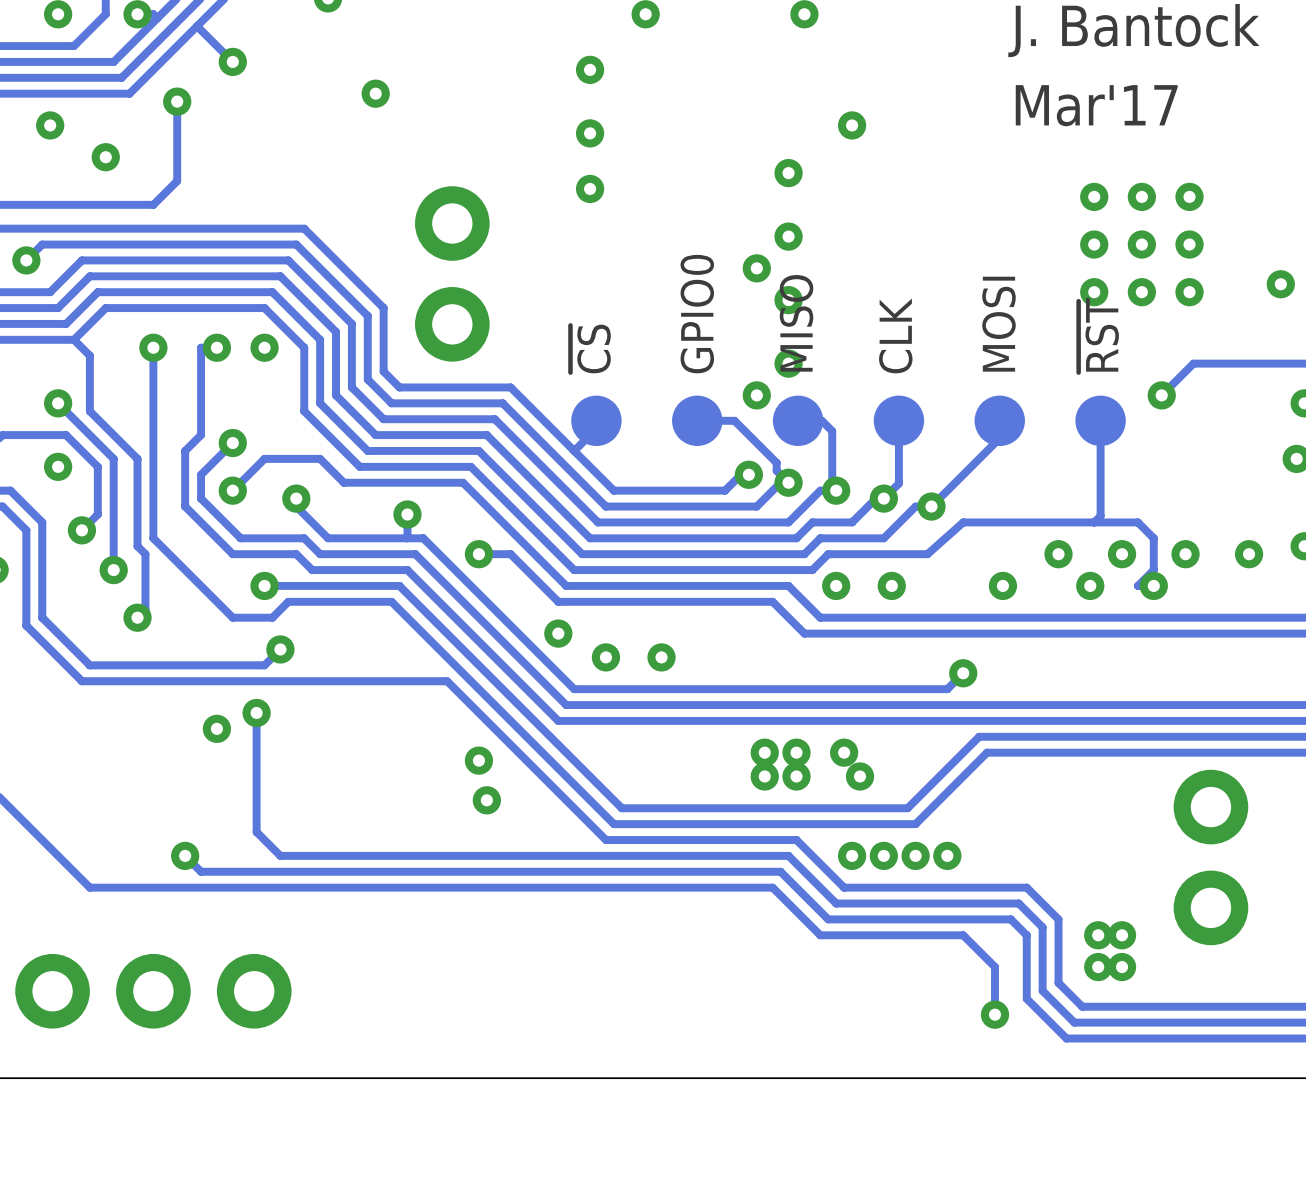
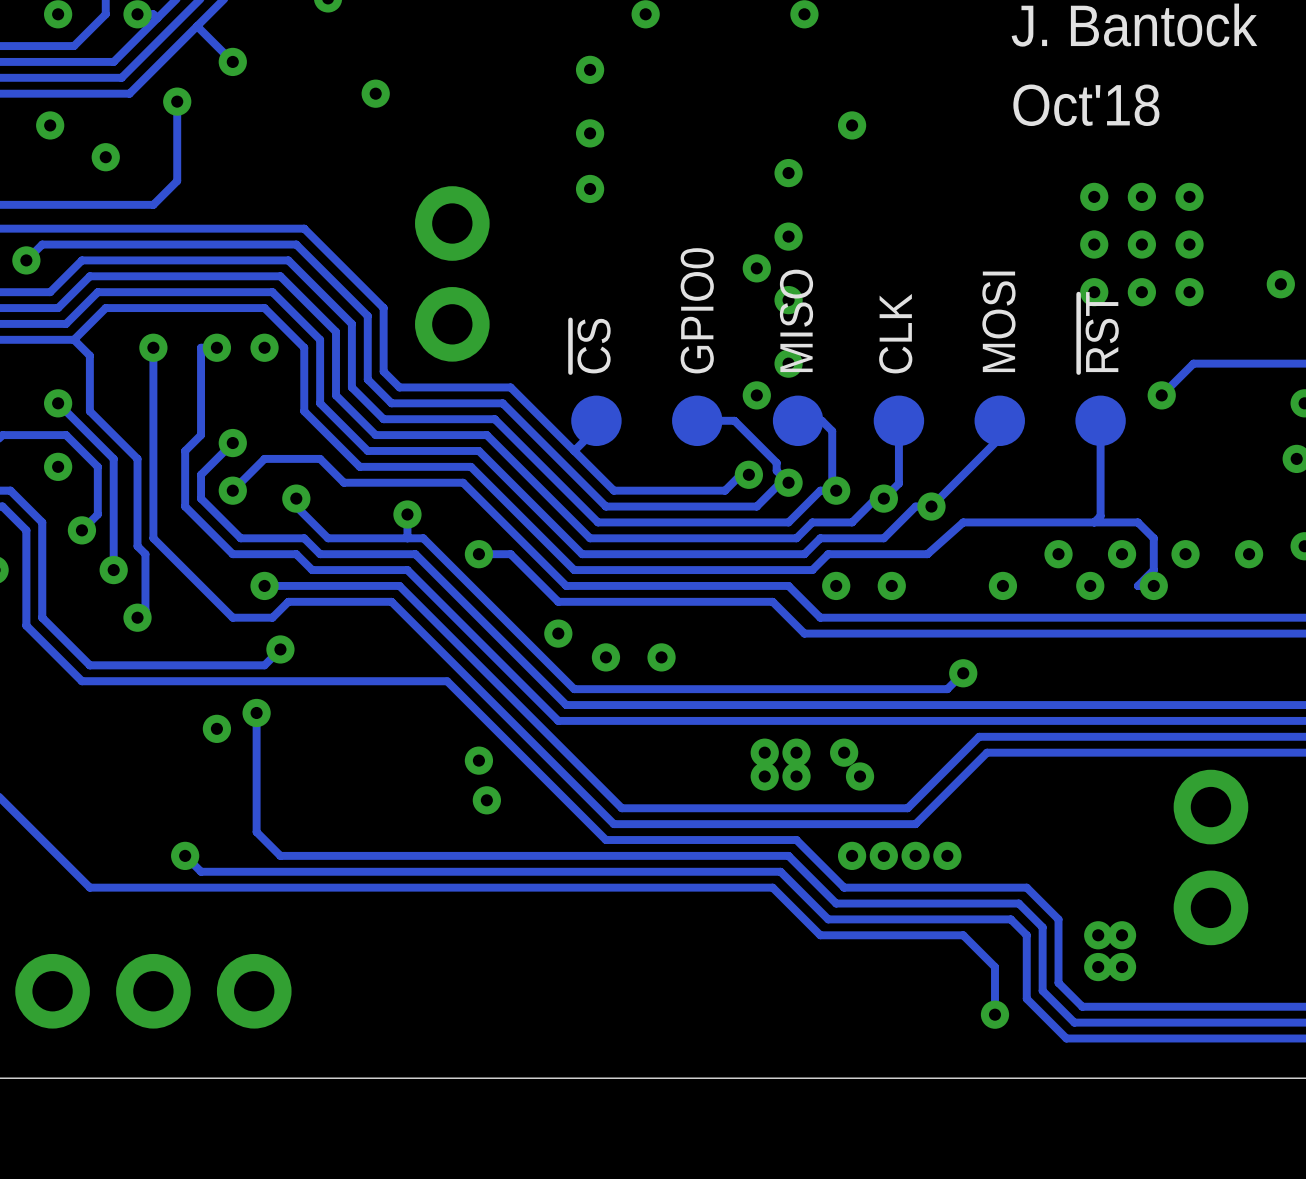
text: Mar'17 (1096, 105) -> Oct'18 (1086, 105)

